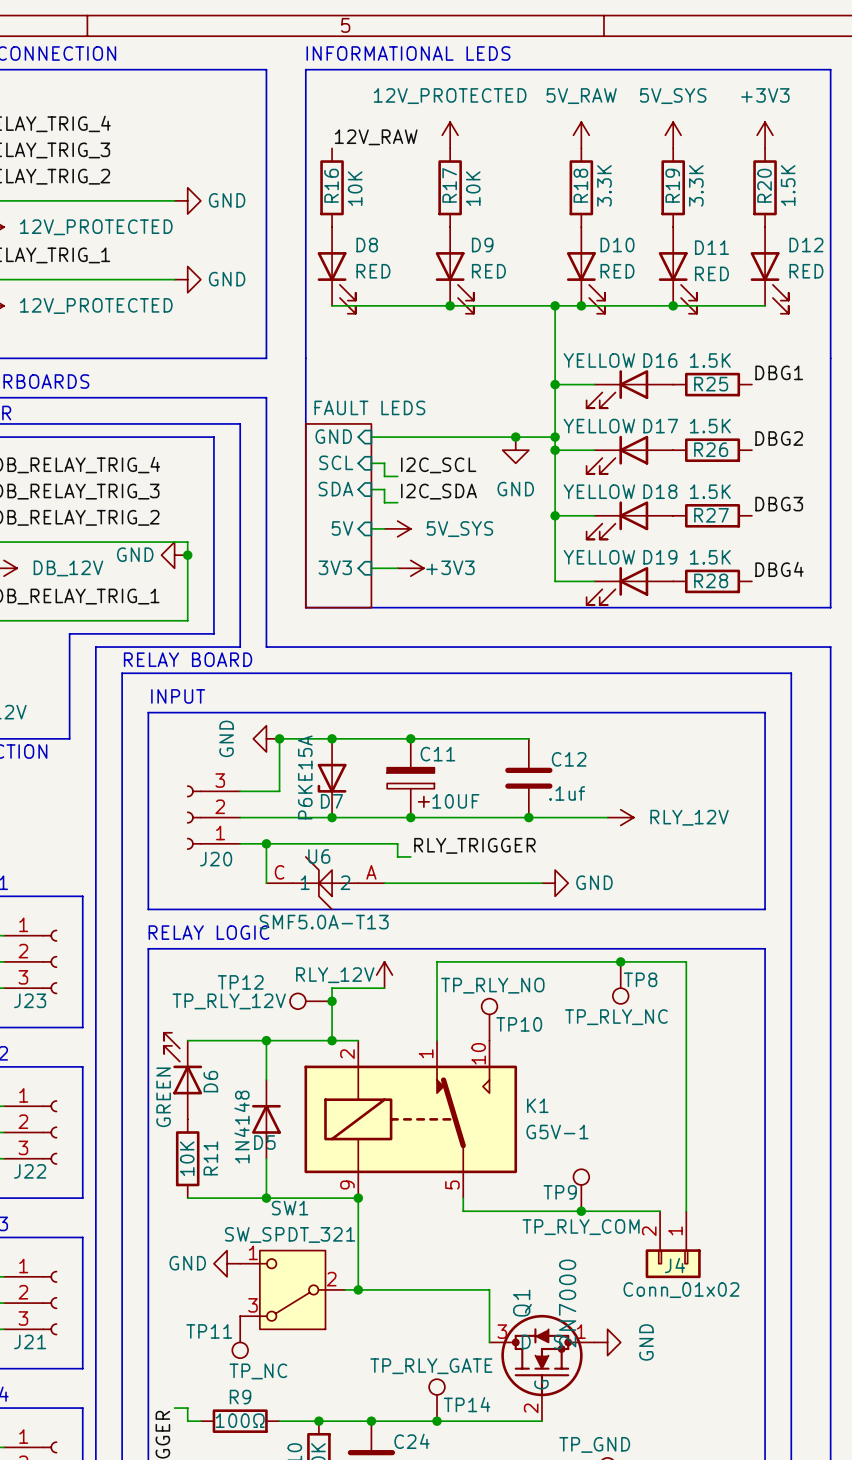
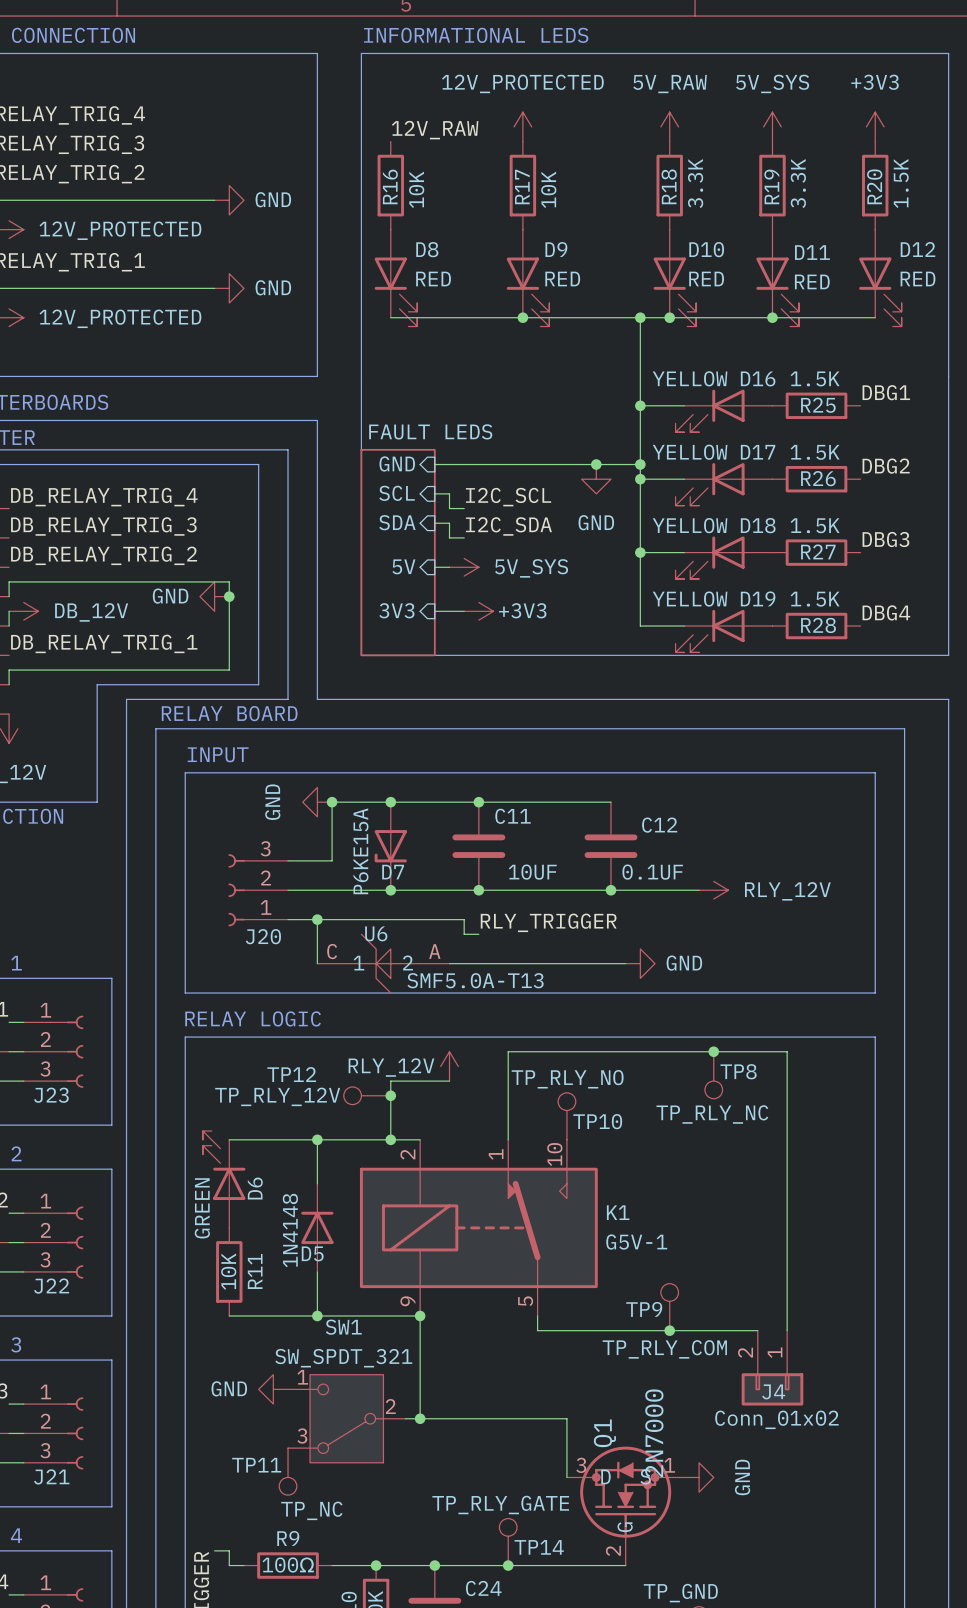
C11 symbol: [387, 738, 435, 818] -> [452, 802, 506, 891]
C12 value: .1uf (567, 793) -> 0.1UF (652, 872)
U6 value position: SMF5.0A-T13 (324, 922) -> SMF5.0A-T13 (475, 980)

